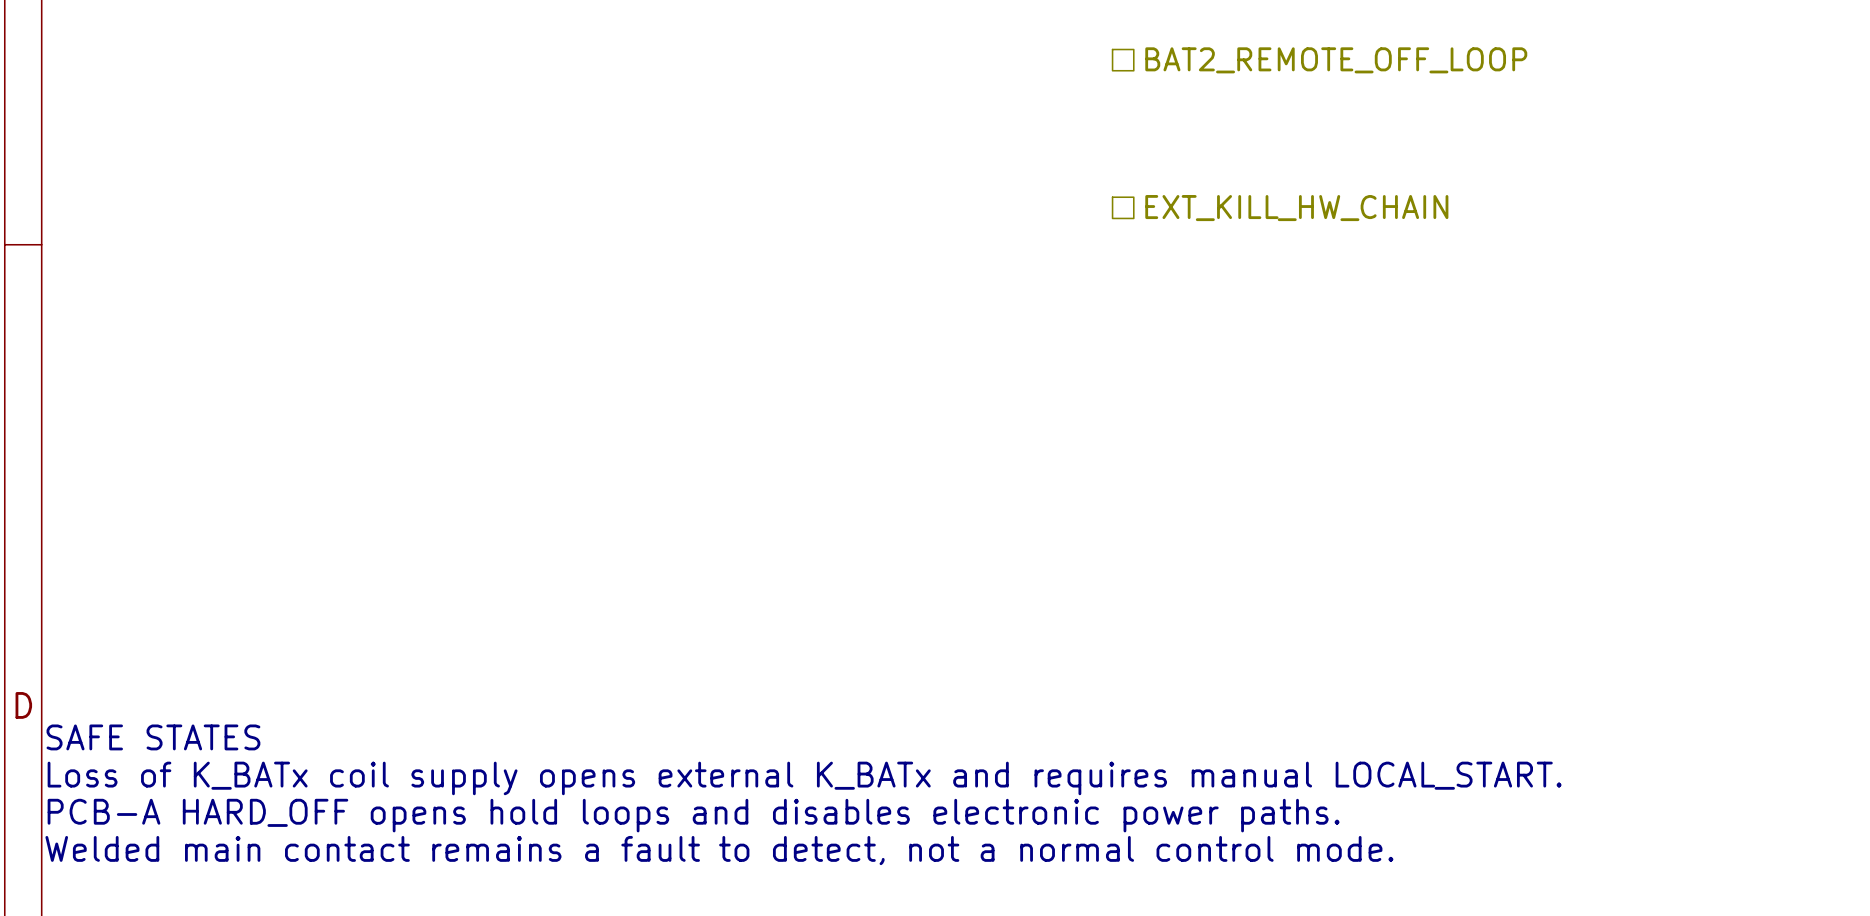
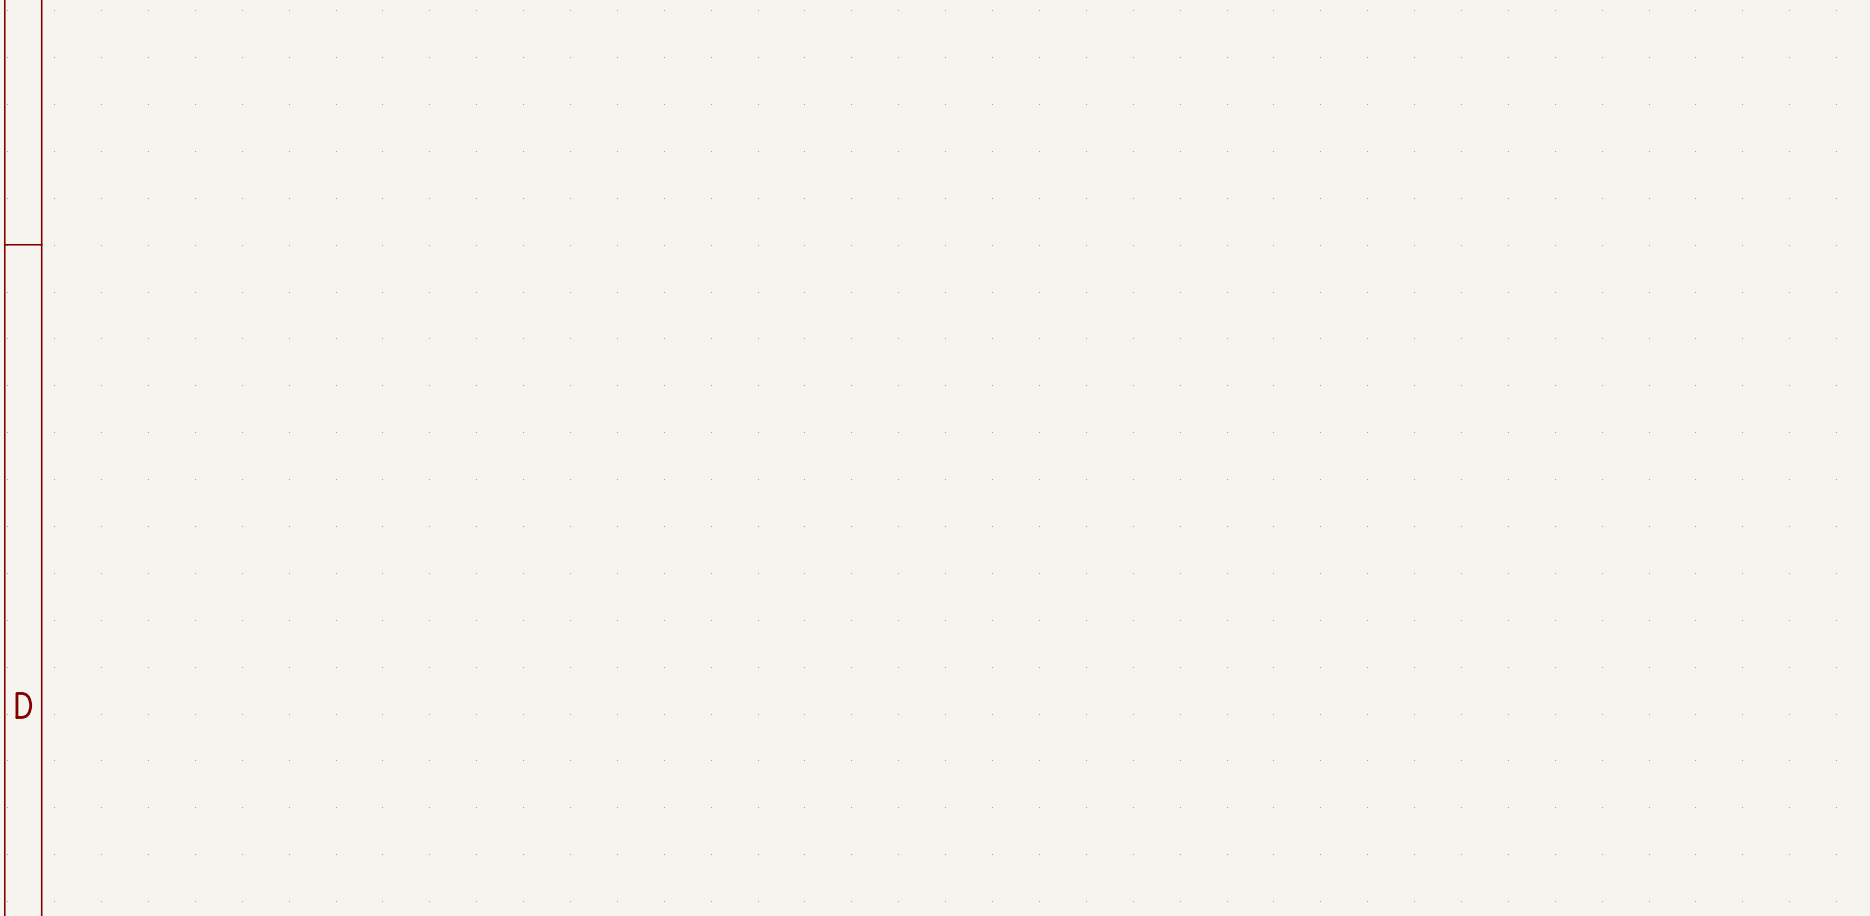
hierarchical label: BAT2_REMOTE_OFF_LOOP (1336, 60) -> none
hierarchical label: EXT_KILL_HW_CHAIN (1296, 208) -> none
text: SAFE STATES (153, 737) -> none
text: Loss of K_BATx coil supply opens external K_BATx and requires manual LOCAL_START. (804, 778) -> none
text: PCB-A HARD_OFF opens hold loops and disables electronic power paths. (693, 815) -> none
text: Welded main contact remains a fault to detect, not a normal control mode. (719, 850) -> none

